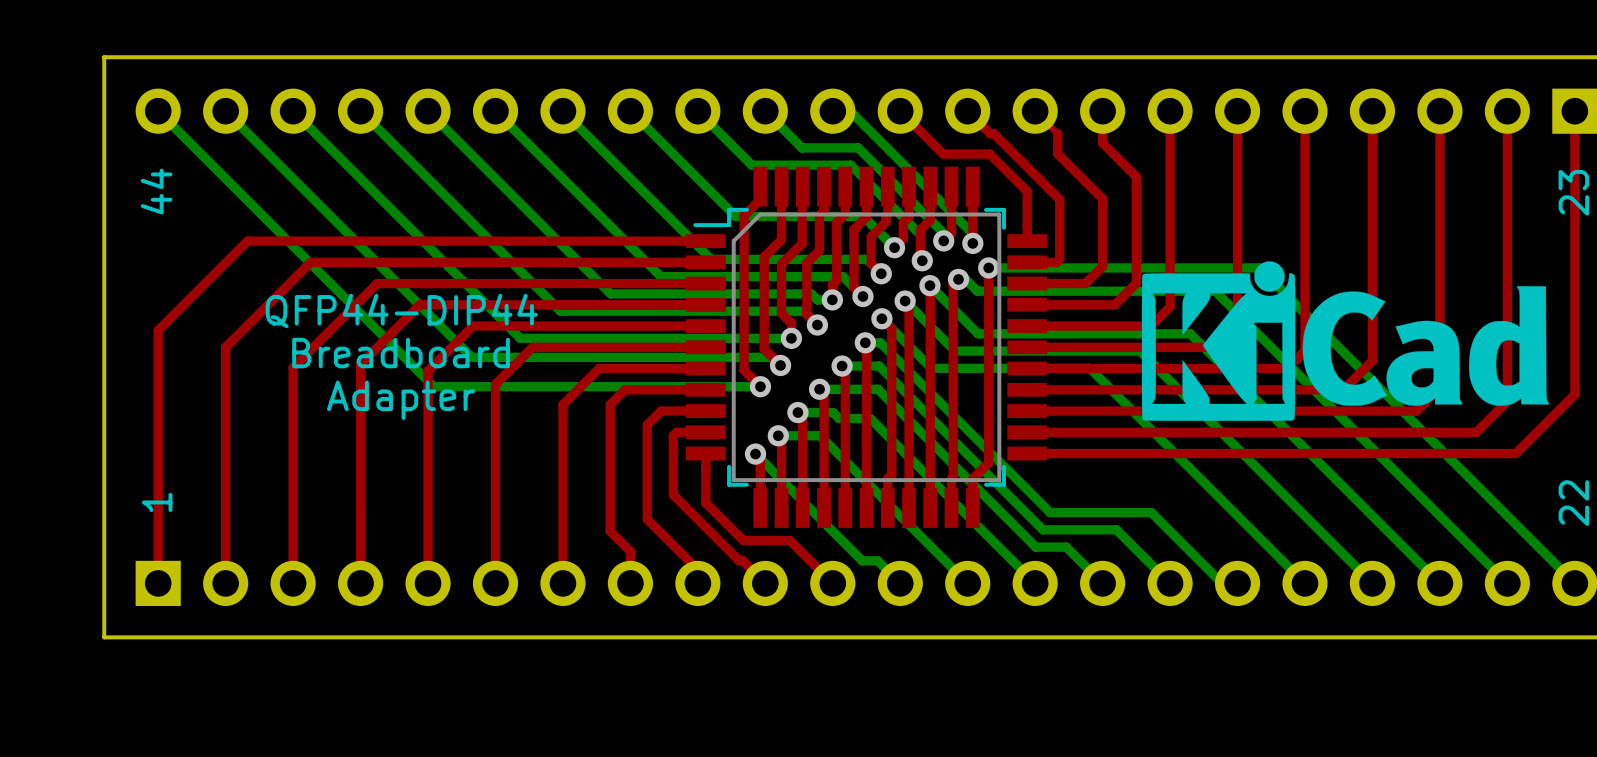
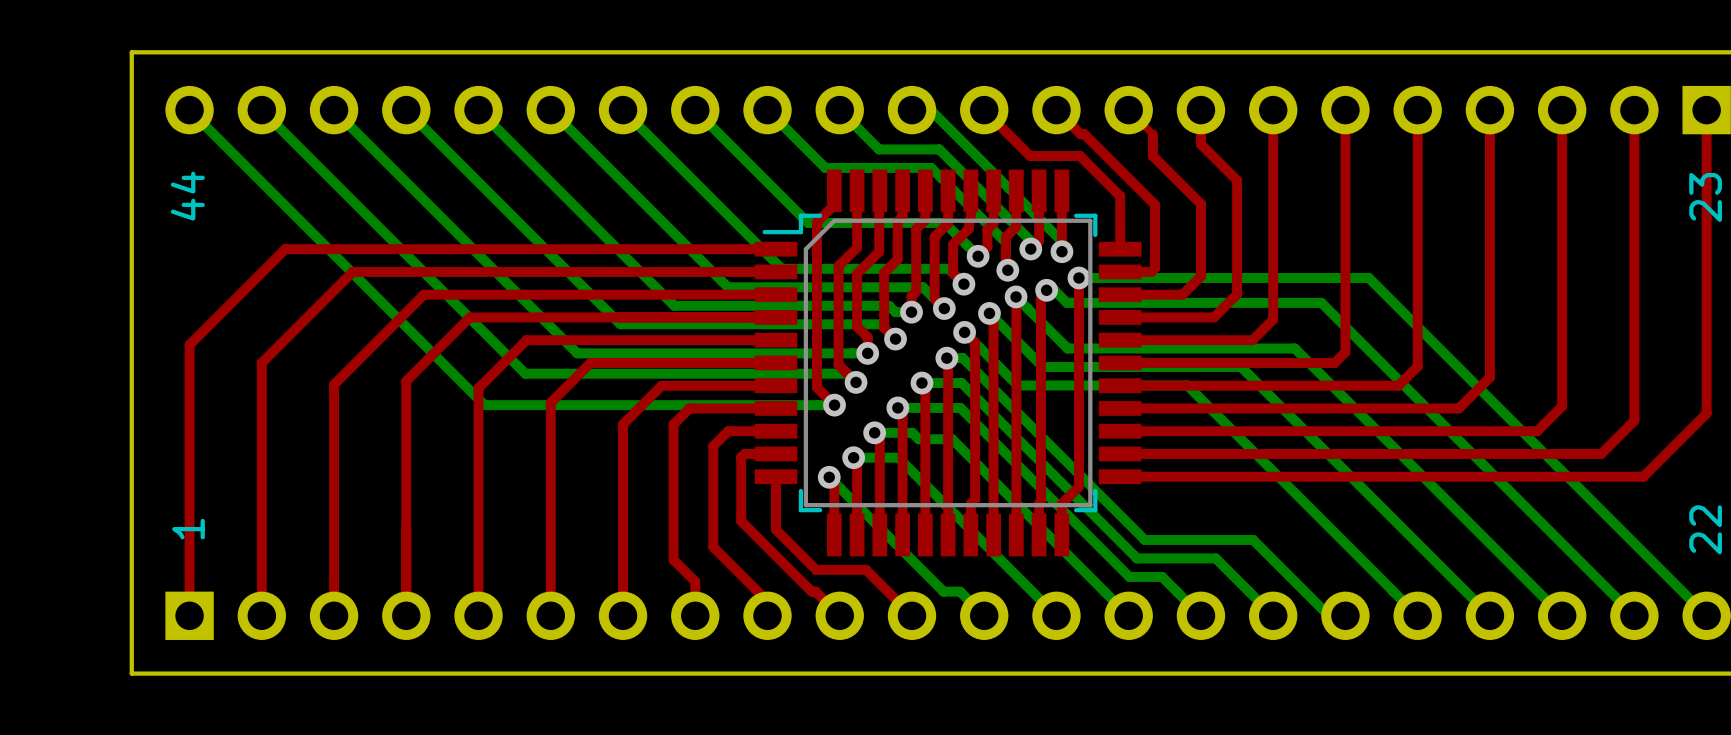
drawing: [1141, 261, 1550, 421] -> none
text: QFP44-DIP44 (401, 310) -> none
text: Breadboard (401, 353) -> none
text: Adapter (401, 400) -> none

